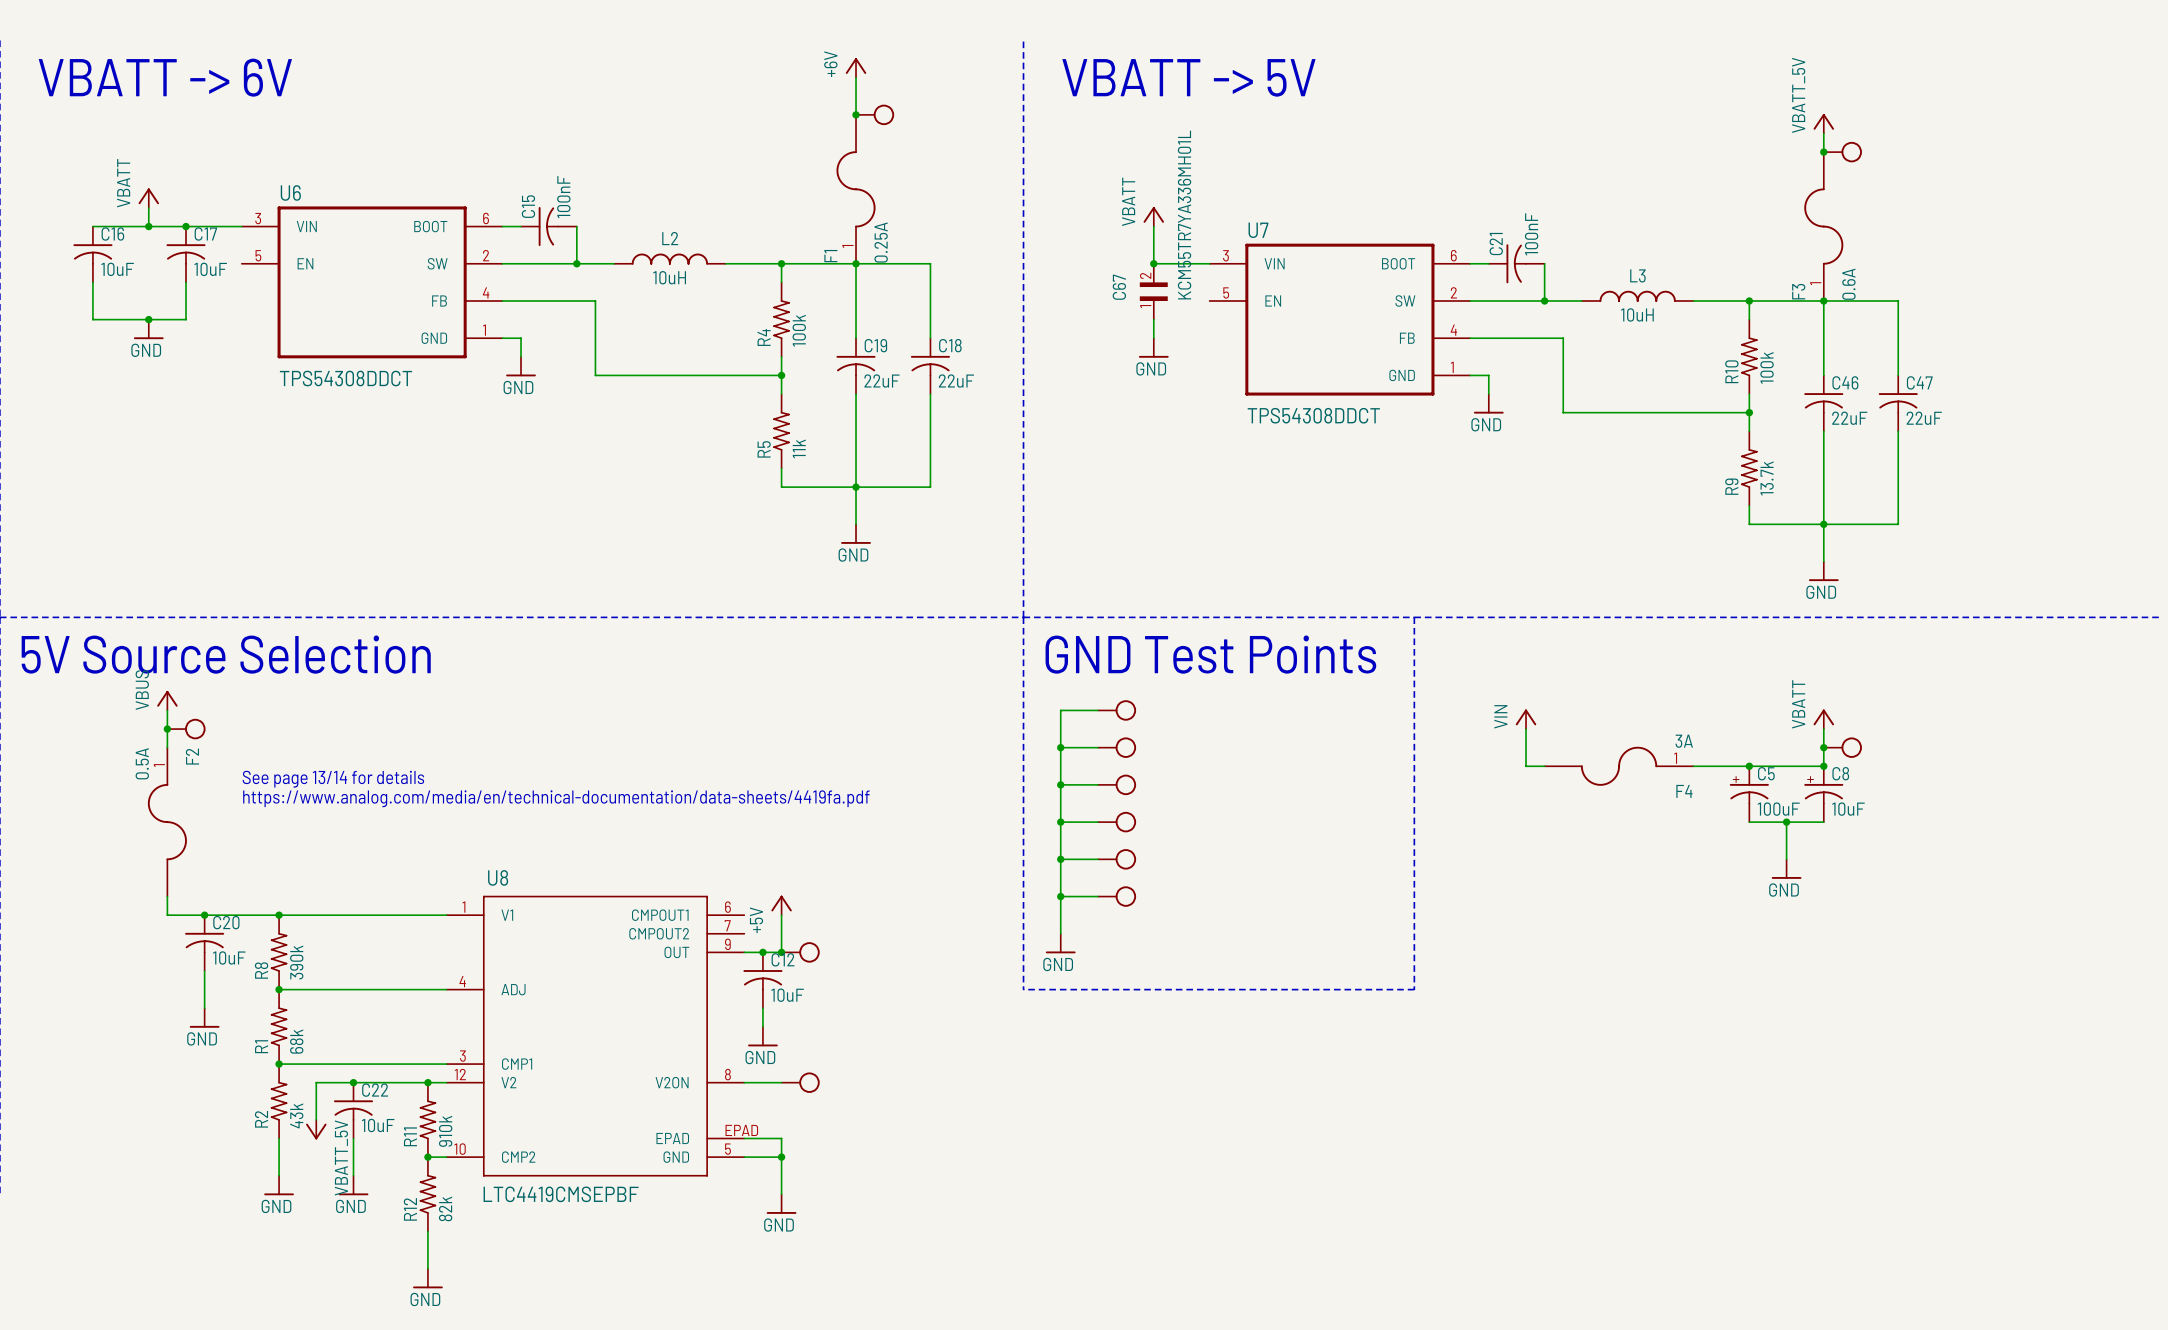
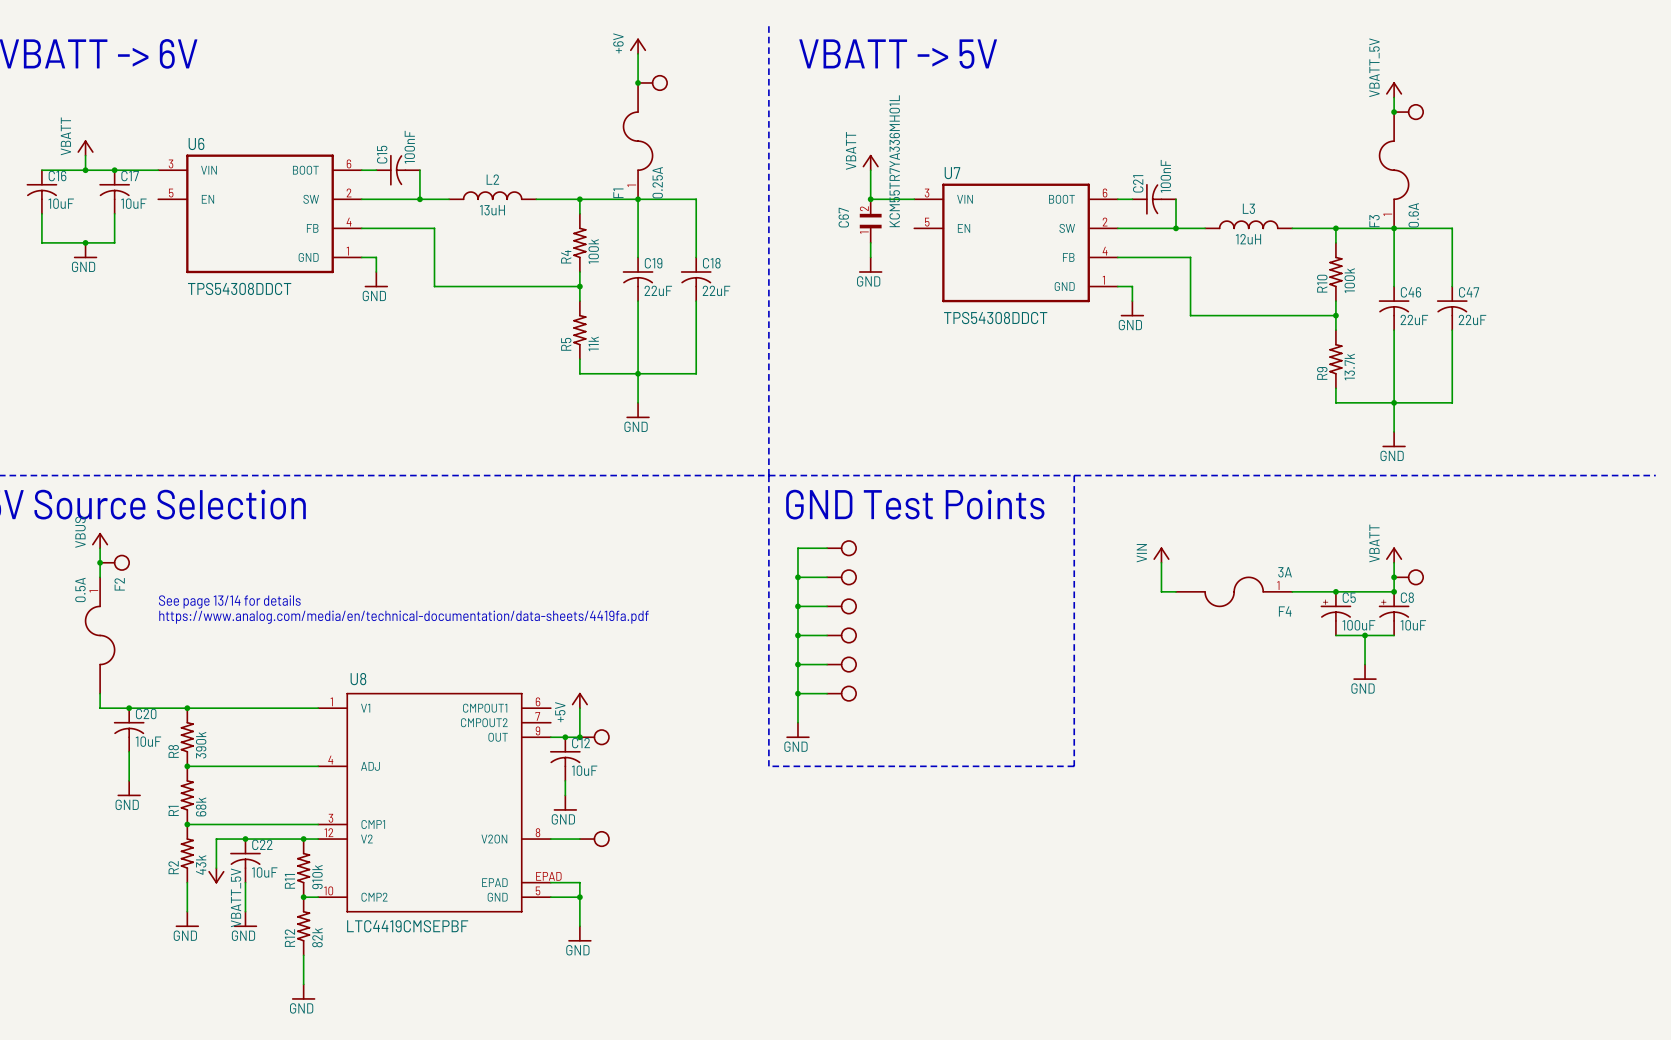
L2 value: 10uH (669, 277) -> 13uH (492, 210)
L3 value: 10uH (1637, 314) -> 12uH (1248, 239)

